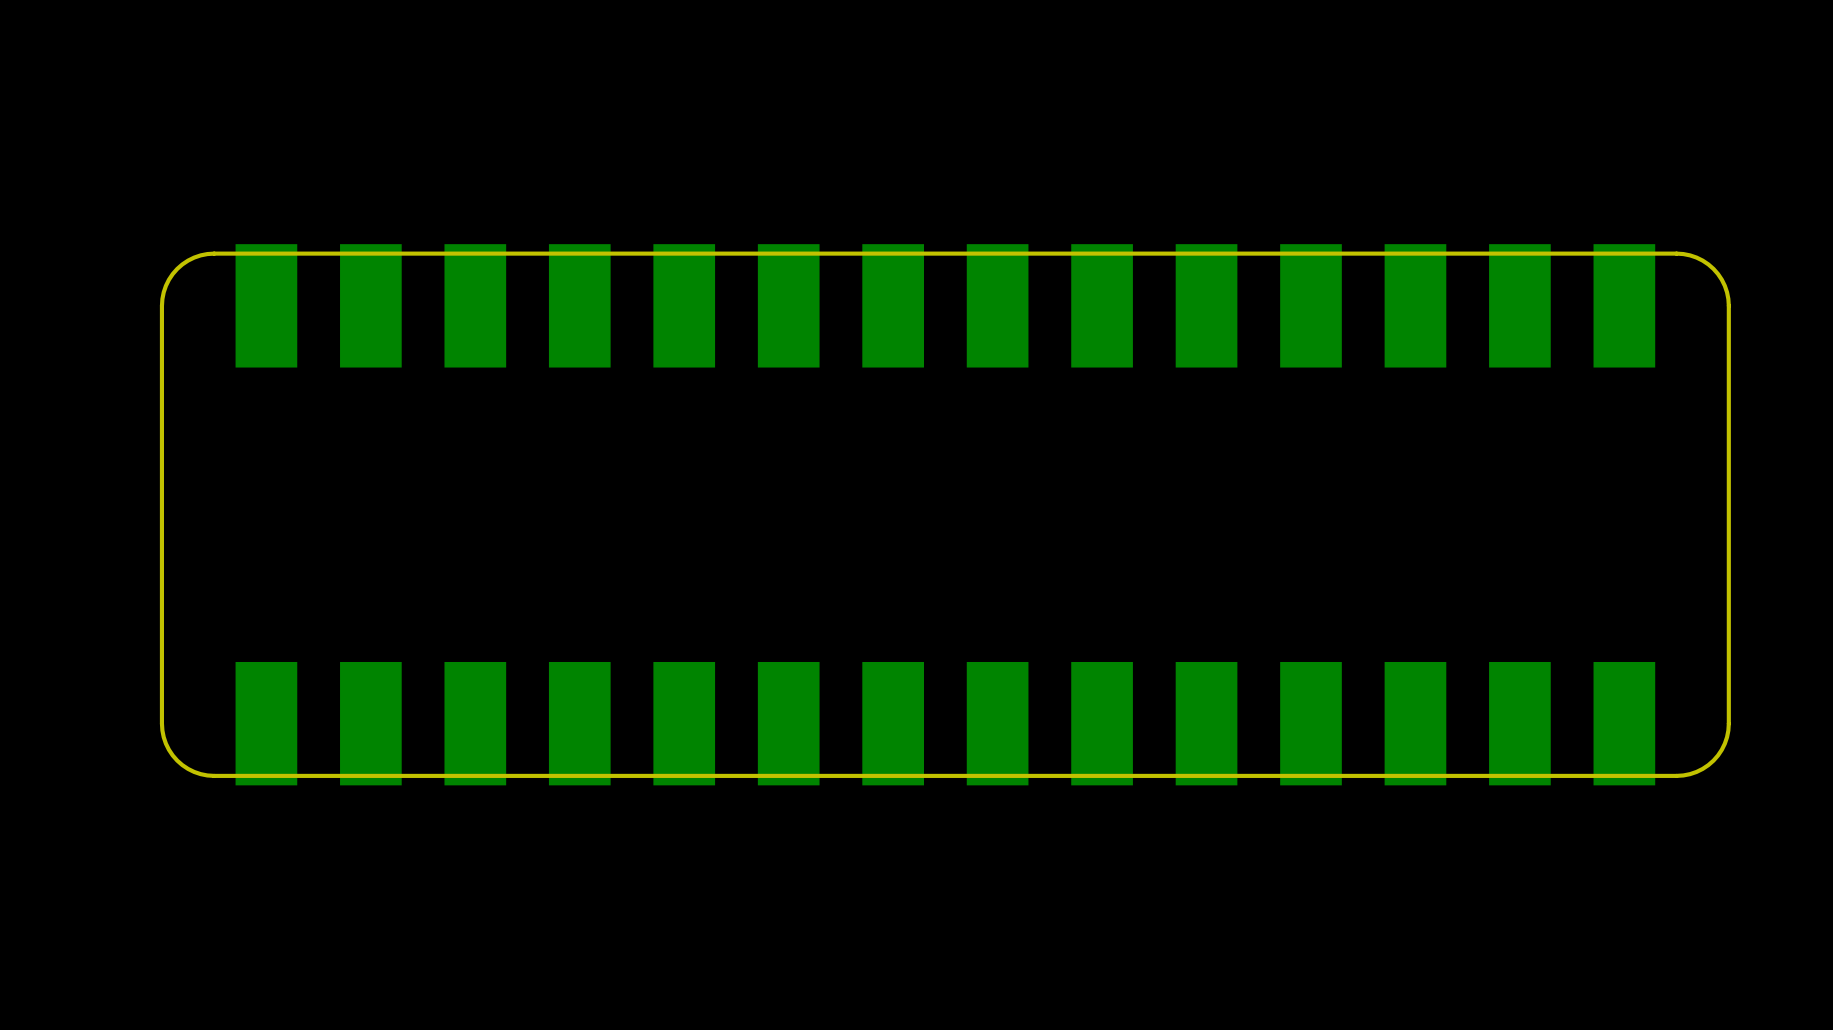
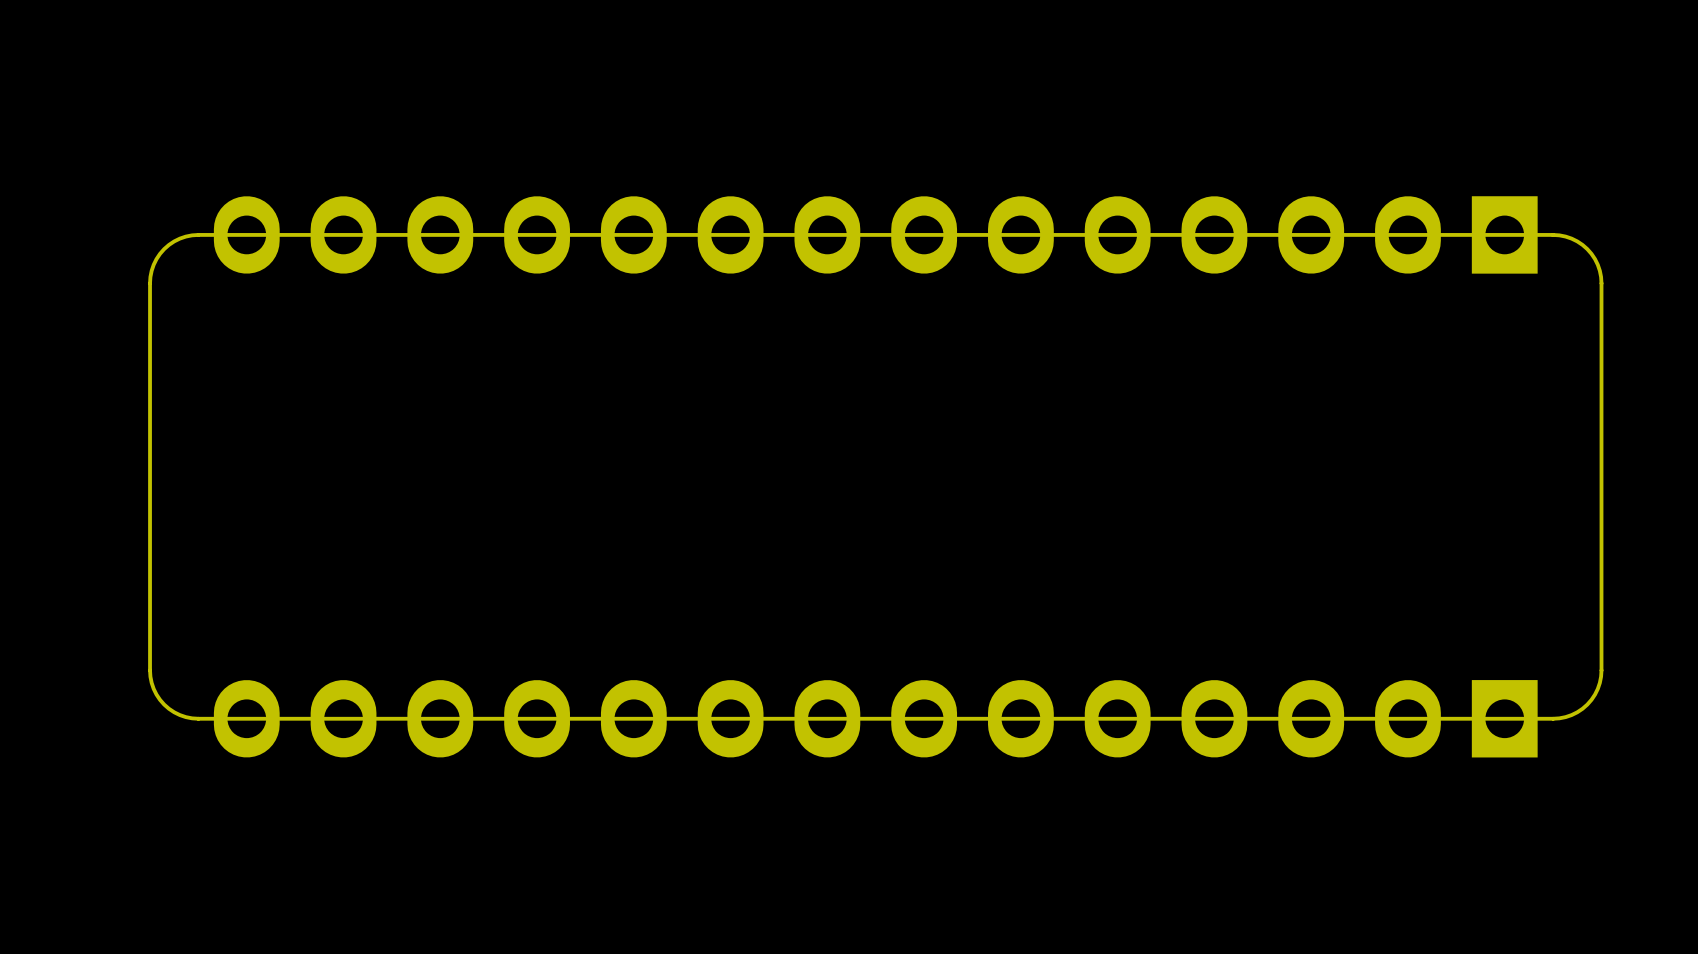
part: none -> (875, 234)
part: (945, 305) -> none
part: (945, 723) -> none
part: none -> (875, 718)

